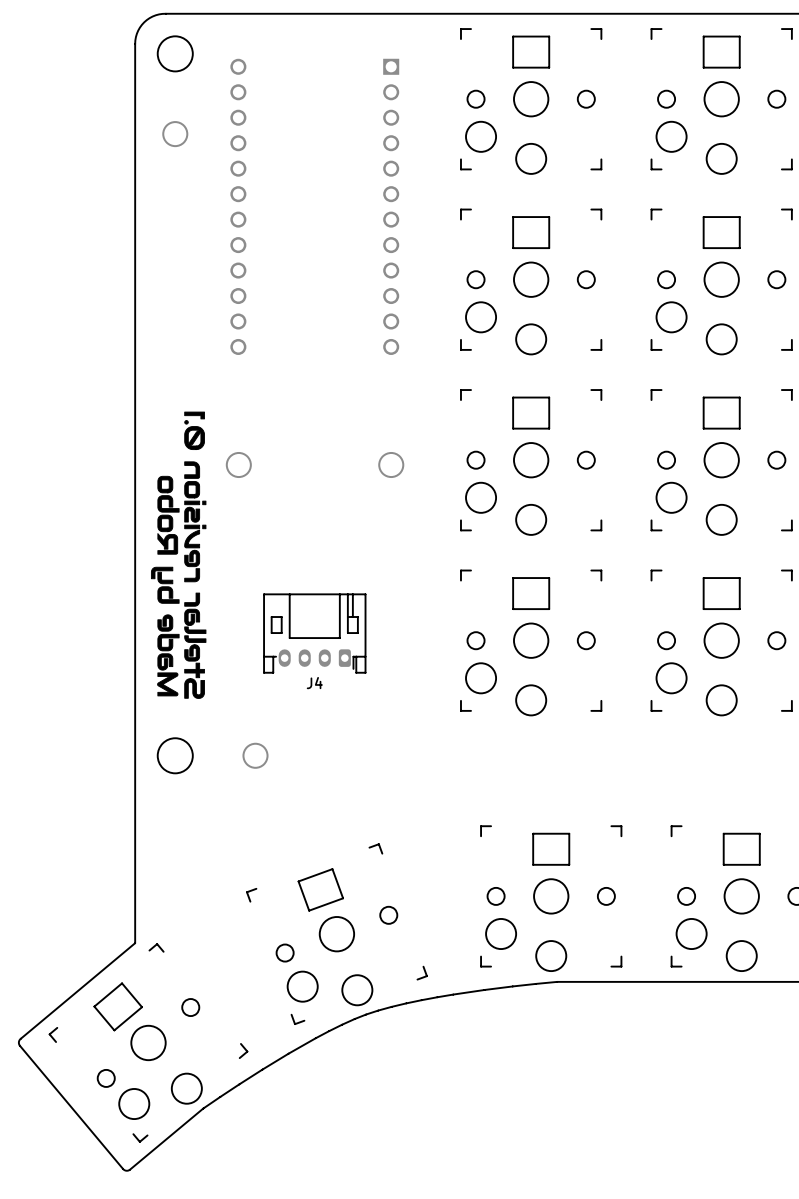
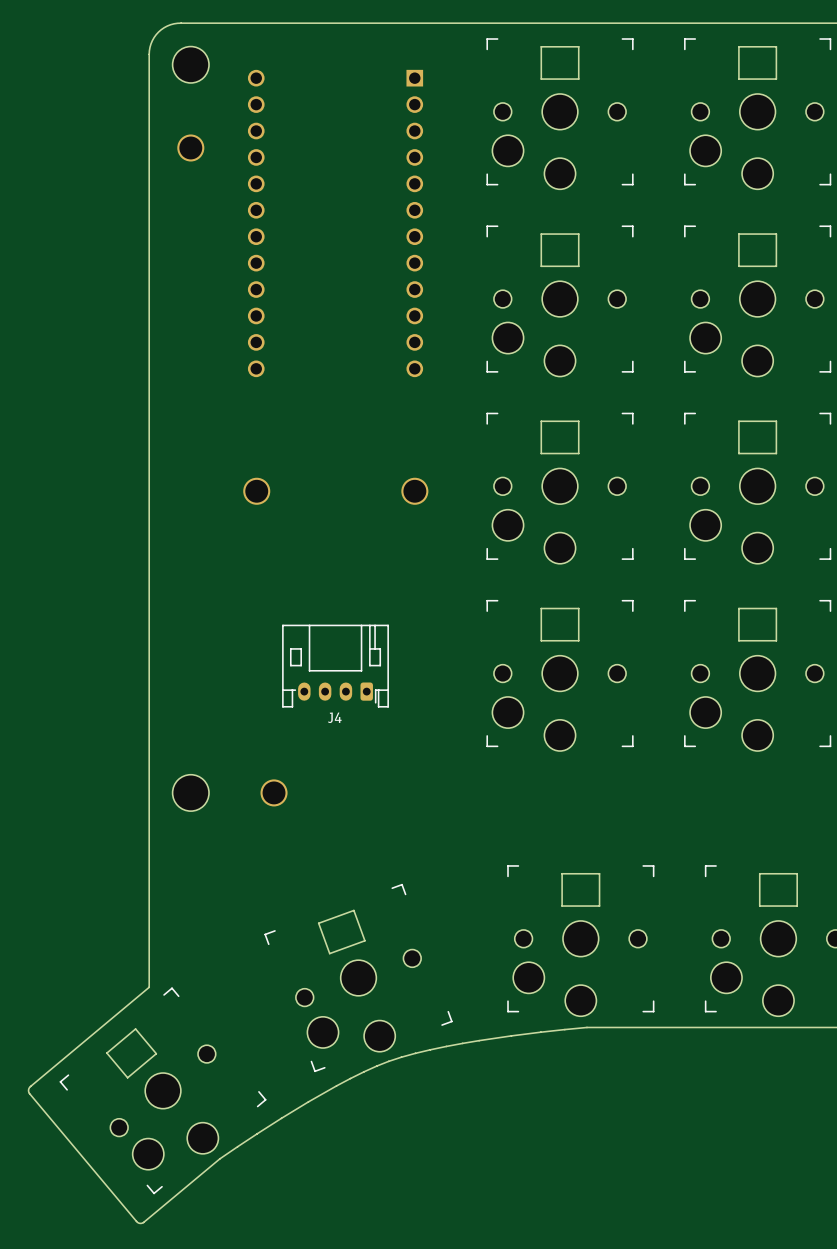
drawing: [150, 411, 207, 699] -> none

